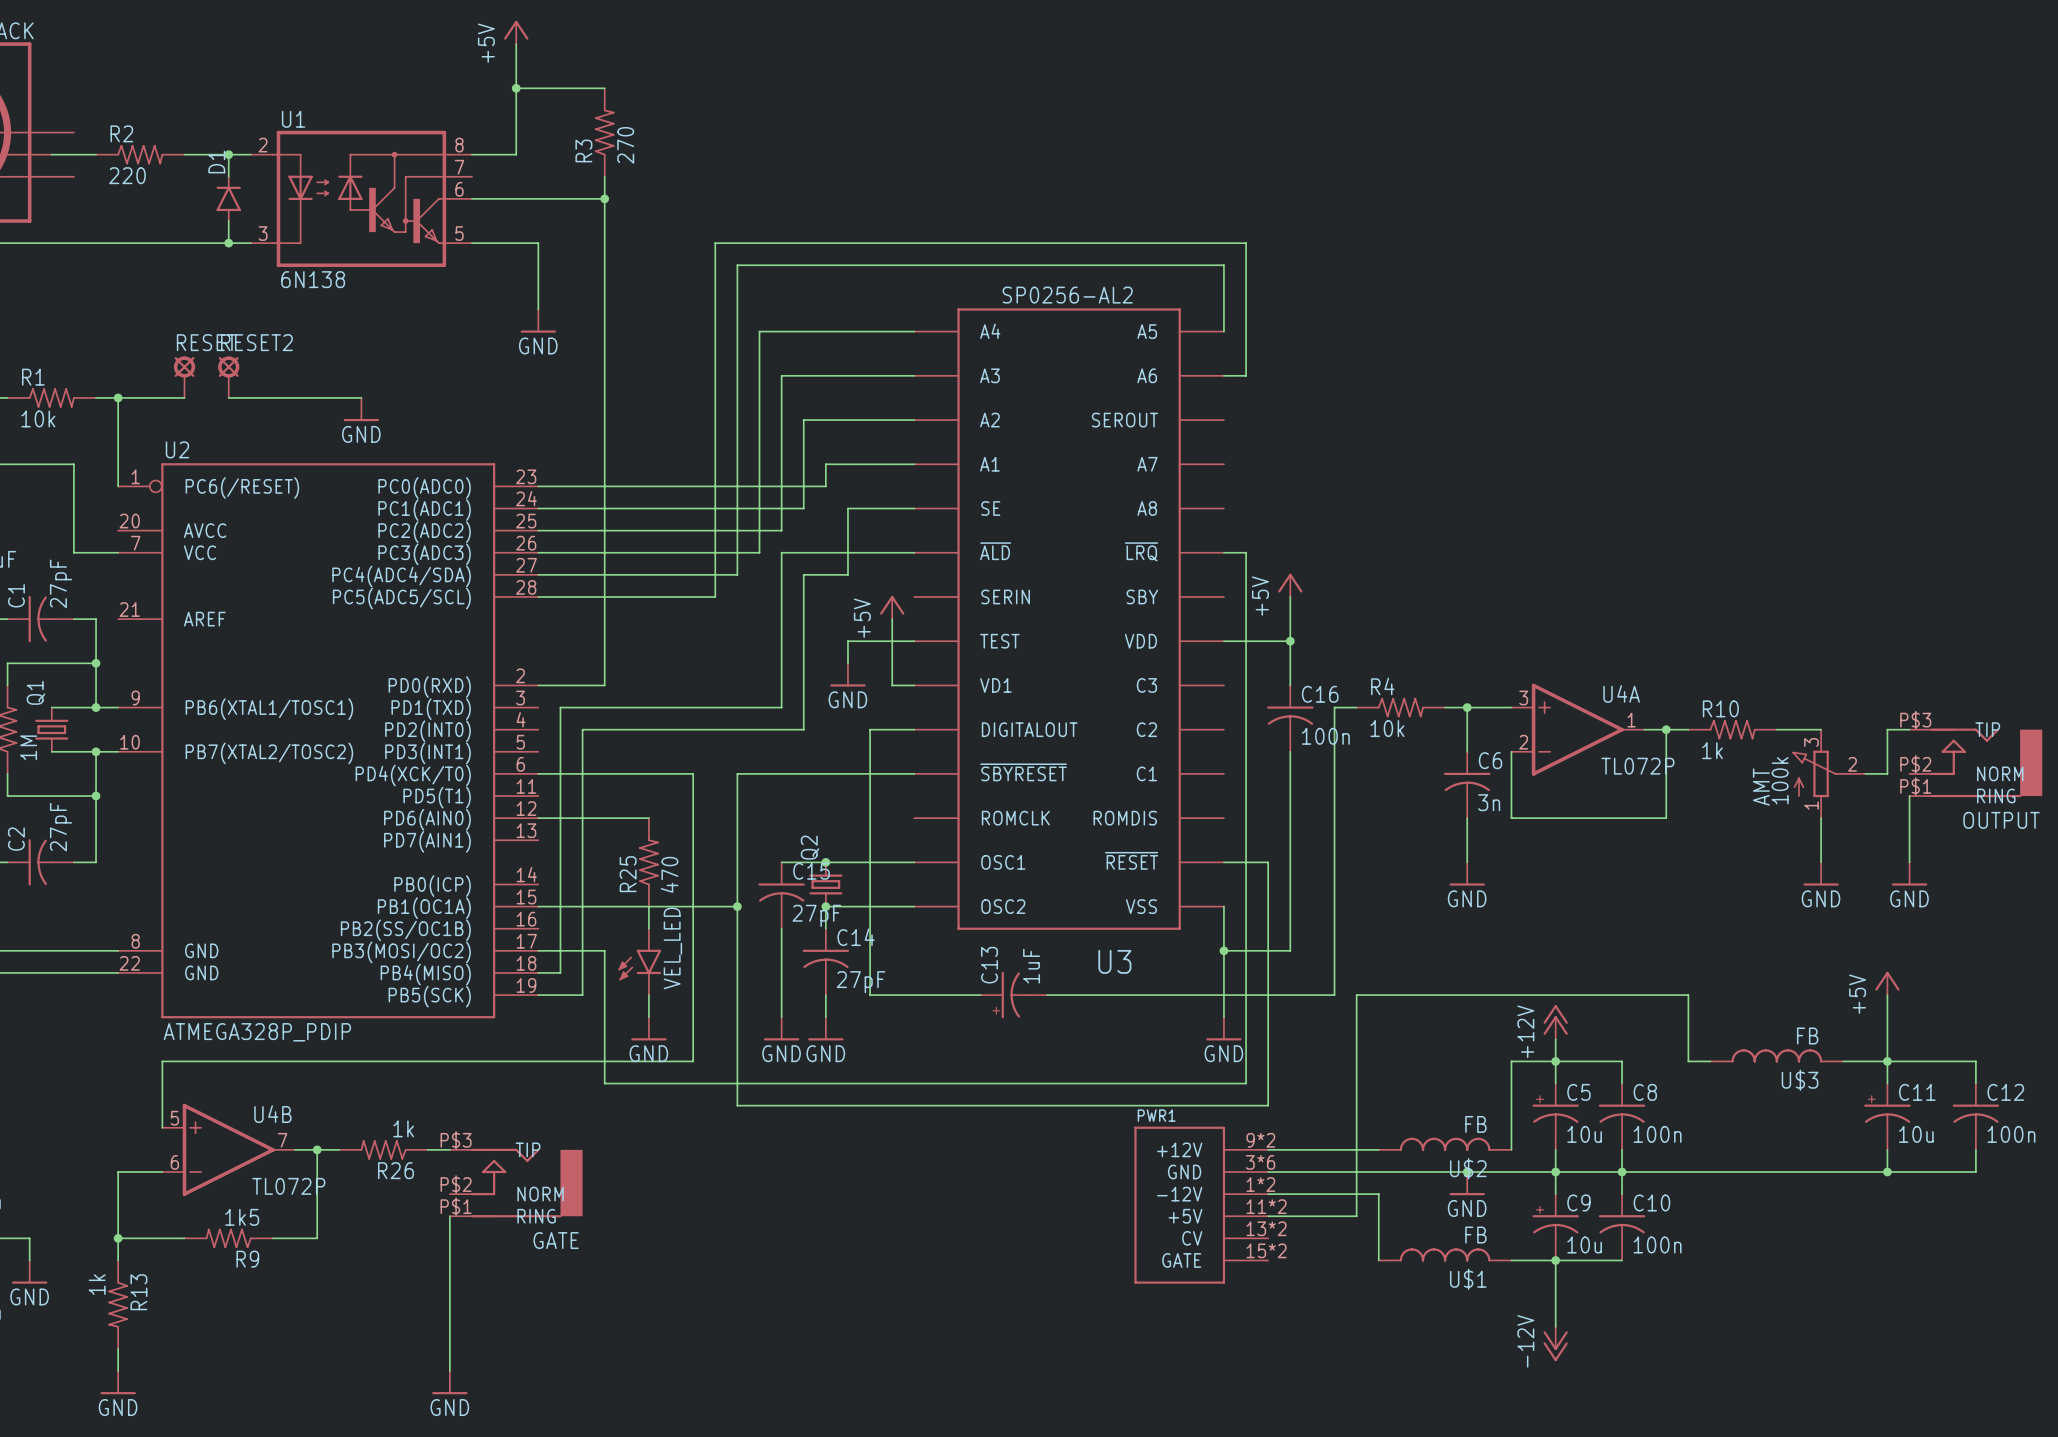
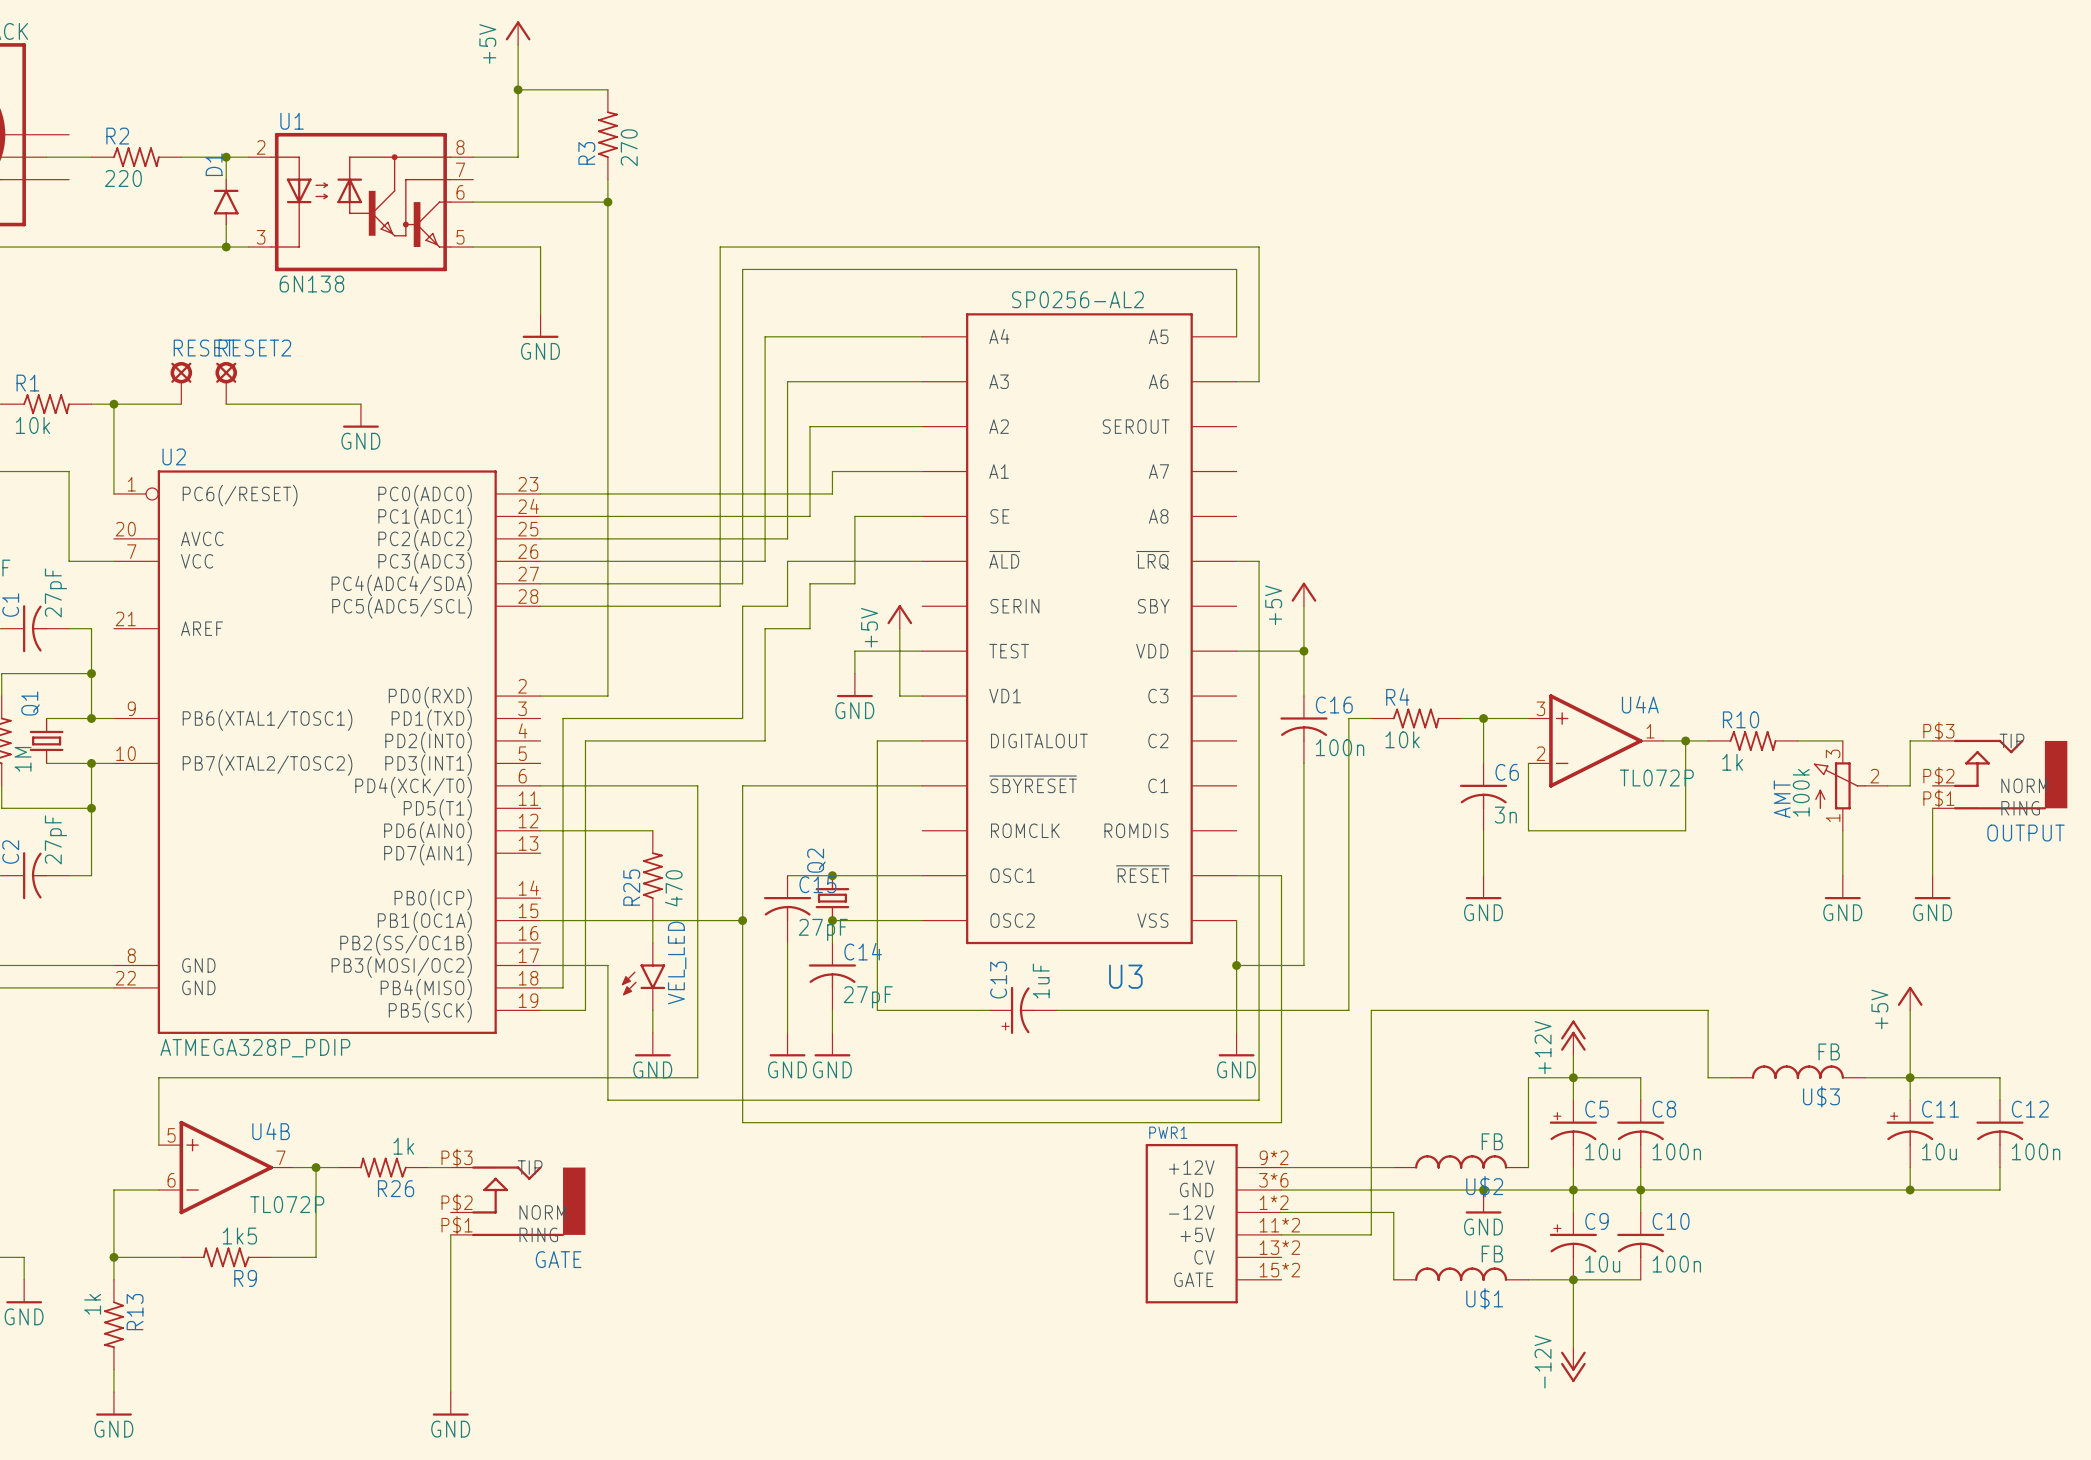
wire: (781, 596) (781, 707) (737, 707) -> (787, 606) (742, 606) (742, 718)
wire: (803, 619) (803, 729) (759, 729) -> (809, 628) (765, 628) (765, 740)

